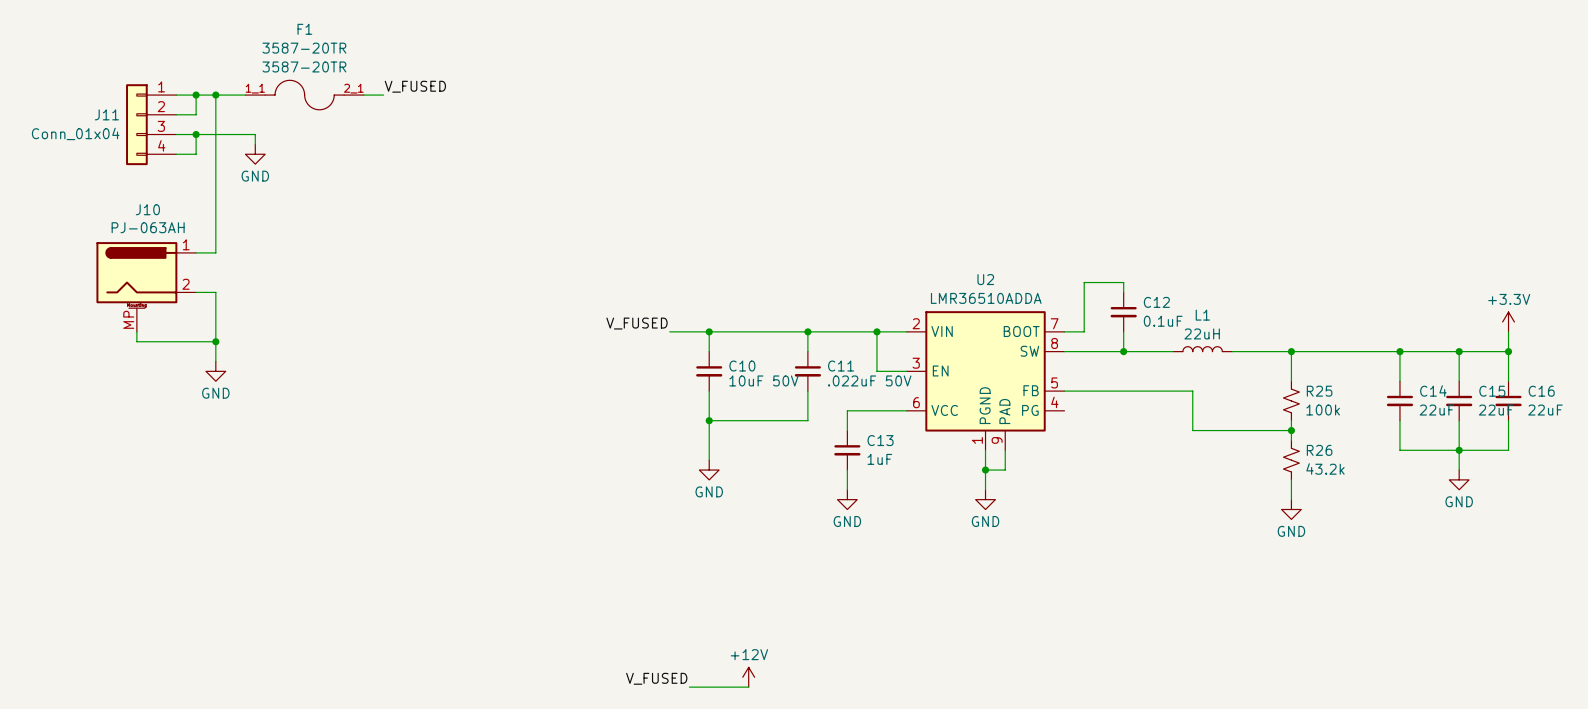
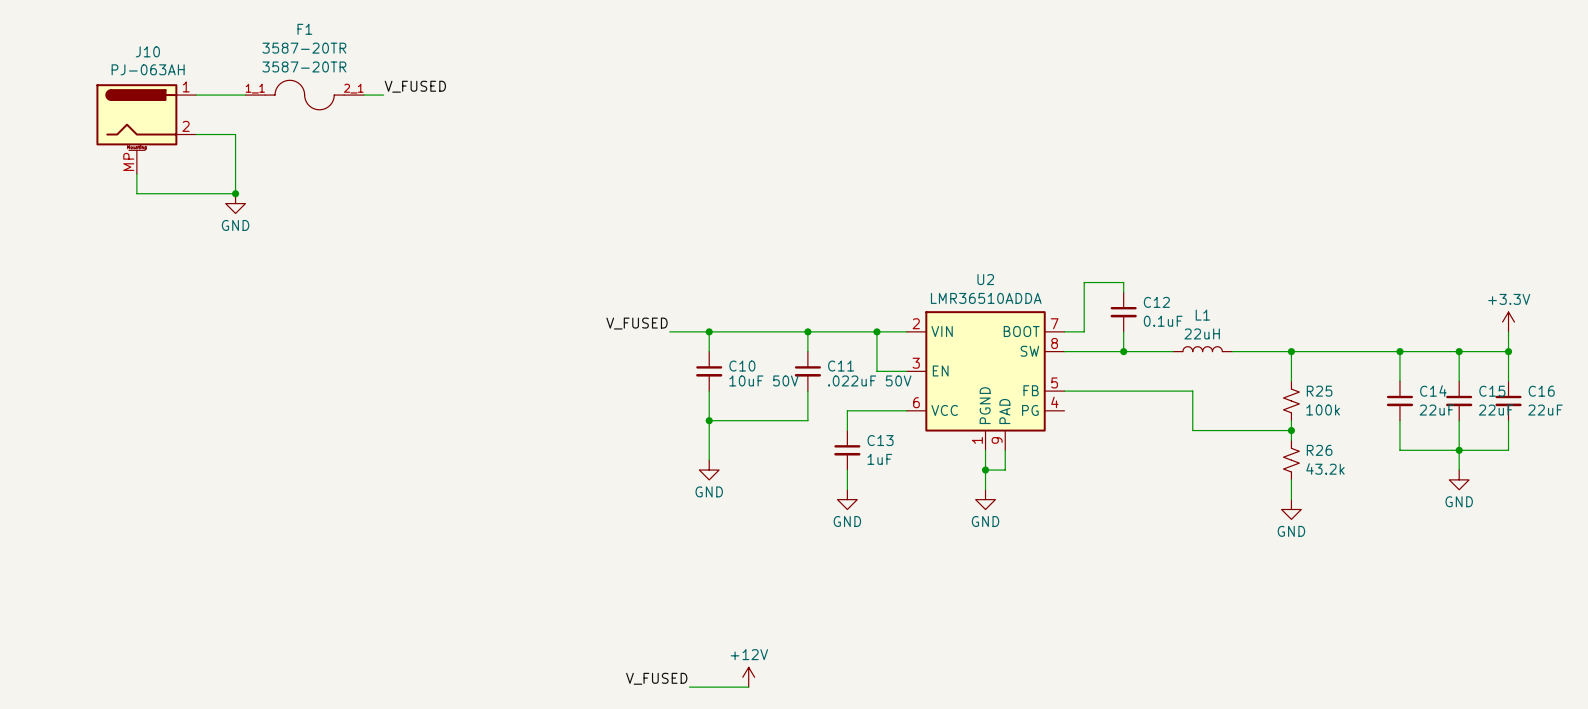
wire: (176, 95) (196, 95) (196, 114) (176, 114) -> none
junction: (196, 95) -> none
wire: (215, 95) (215, 252) (196, 252) -> none
junction: (215, 95) -> none
J11: Conn_01x04 (151, 124) -> none
wire: (176, 134) (196, 134) (196, 154) (176, 154) -> none
junction: (196, 134) -> none
wire: (235, 134) (255, 134) (255, 144) -> (235, 134) (235, 193) (136, 193) (136, 173)
power symbol position: GND (255, 154) -> GND (235, 203)
junction: none -> (235, 193)
J10 position: (146, 286) -> (146, 129)
wire: (196, 292) (215, 292) (215, 361) -> none
wire: (136, 331) (136, 341) (215, 341) -> none
junction: (215, 341) -> none
power symbol: GND (215, 371) -> none

